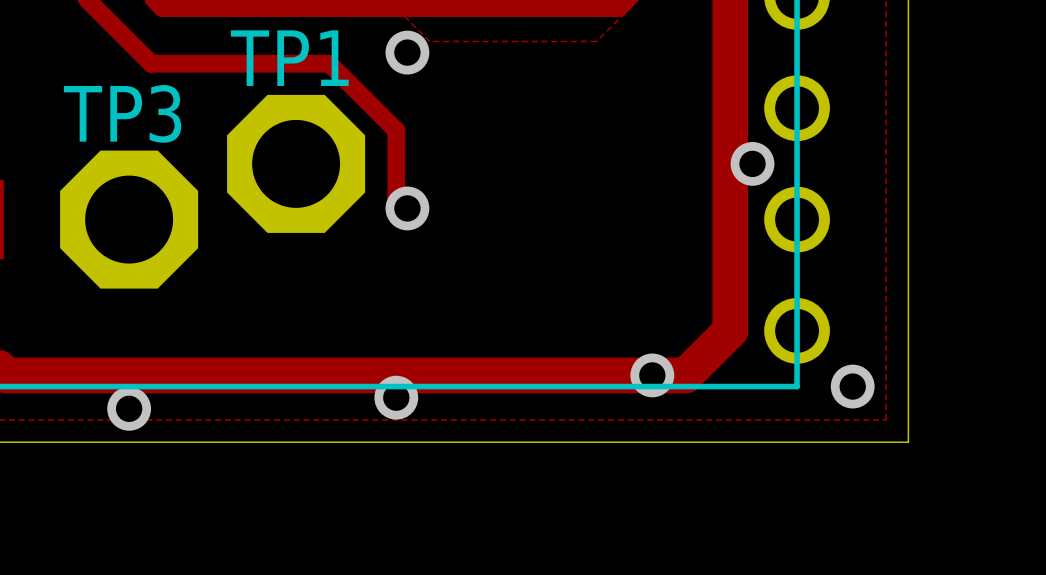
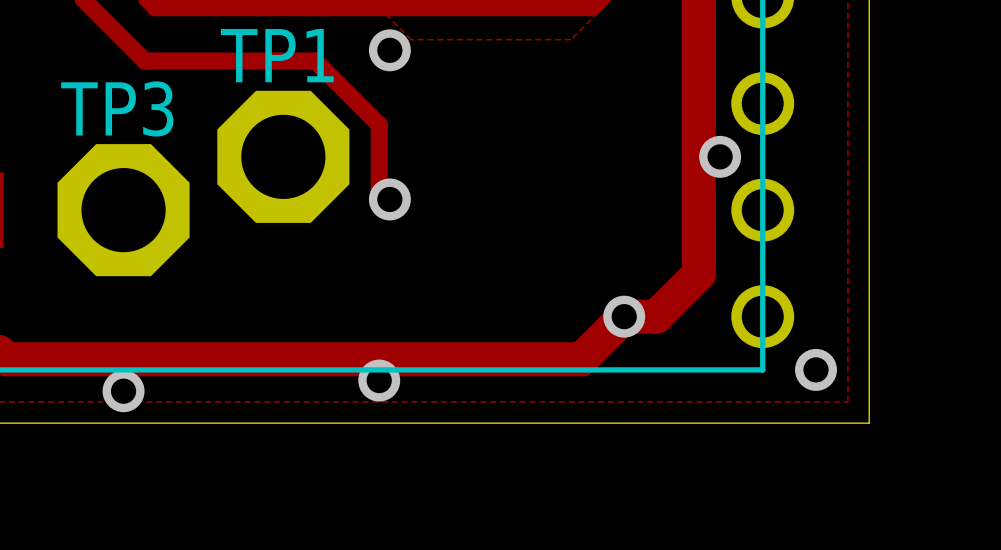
track: (730, 286) (730, 330) (685, 375) (607, 375) -> (698, 274) (656, 316) (624, 316) (581, 359)
via position: (652, 375) -> (624, 316)

